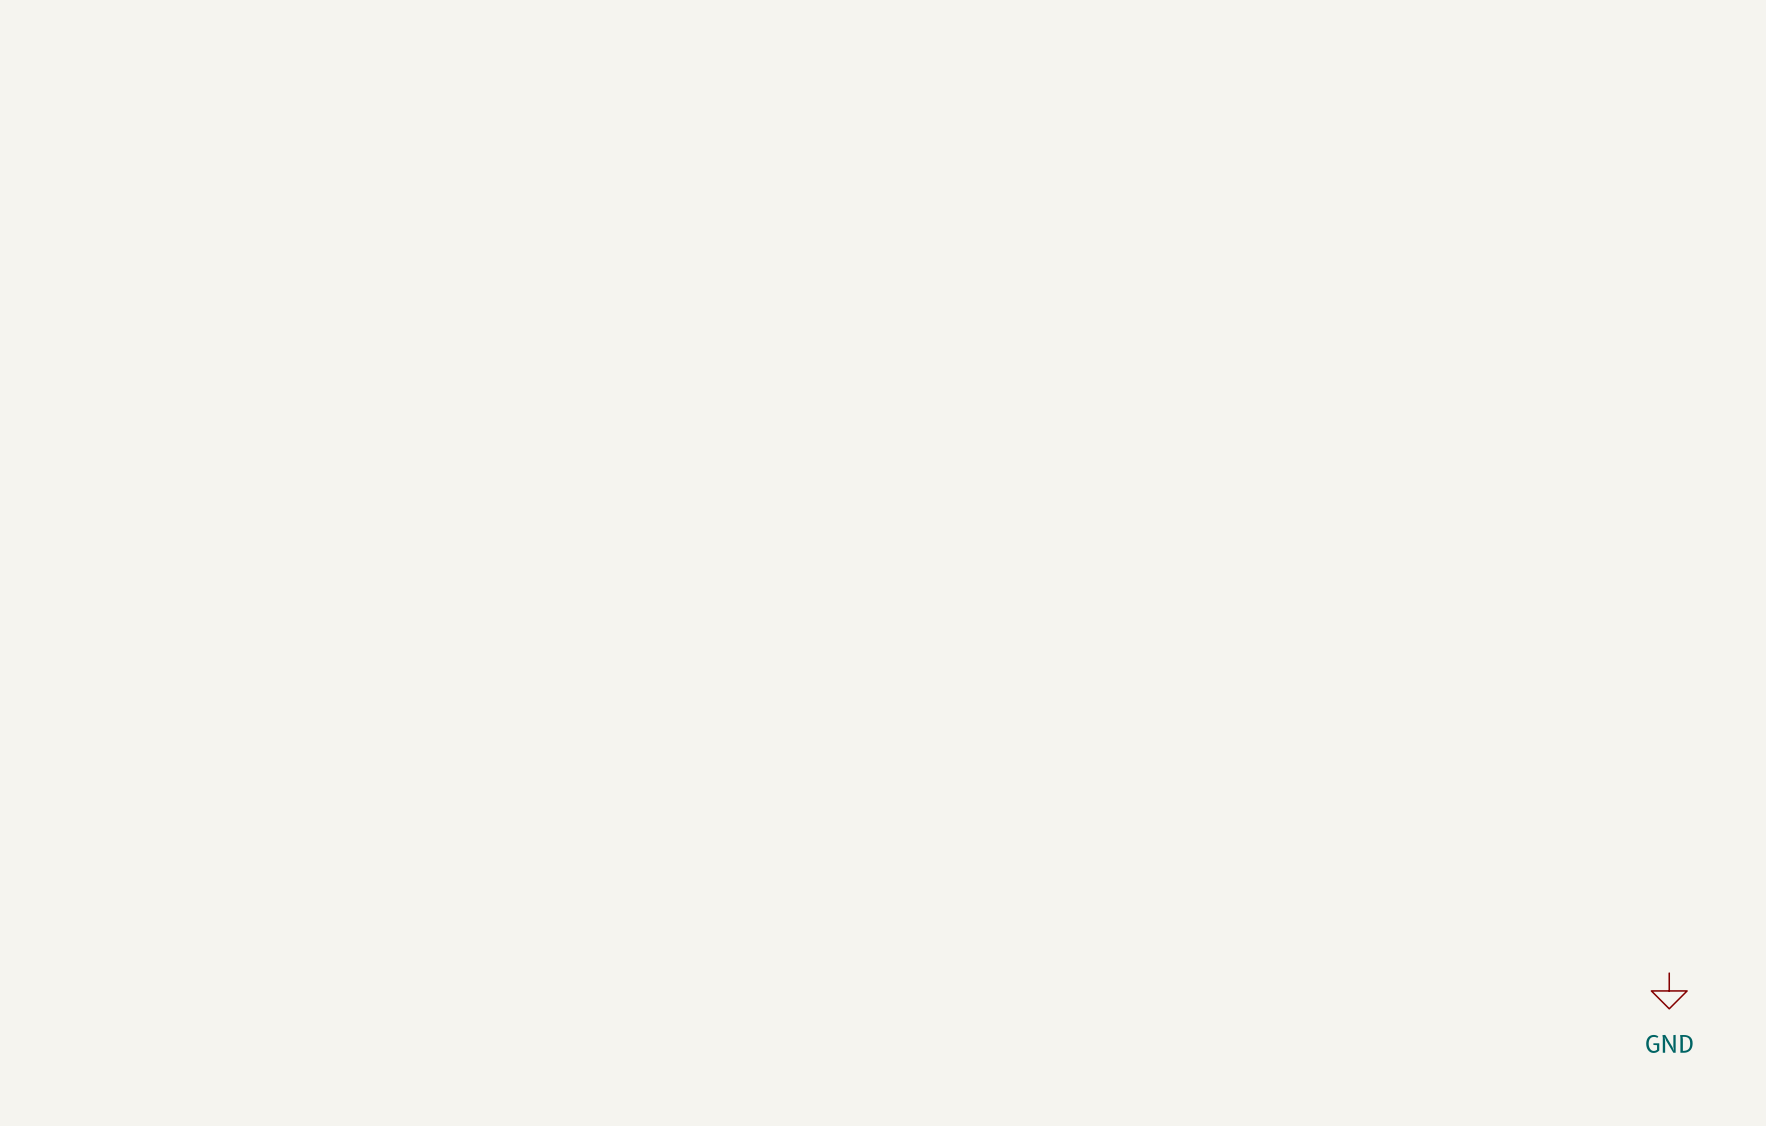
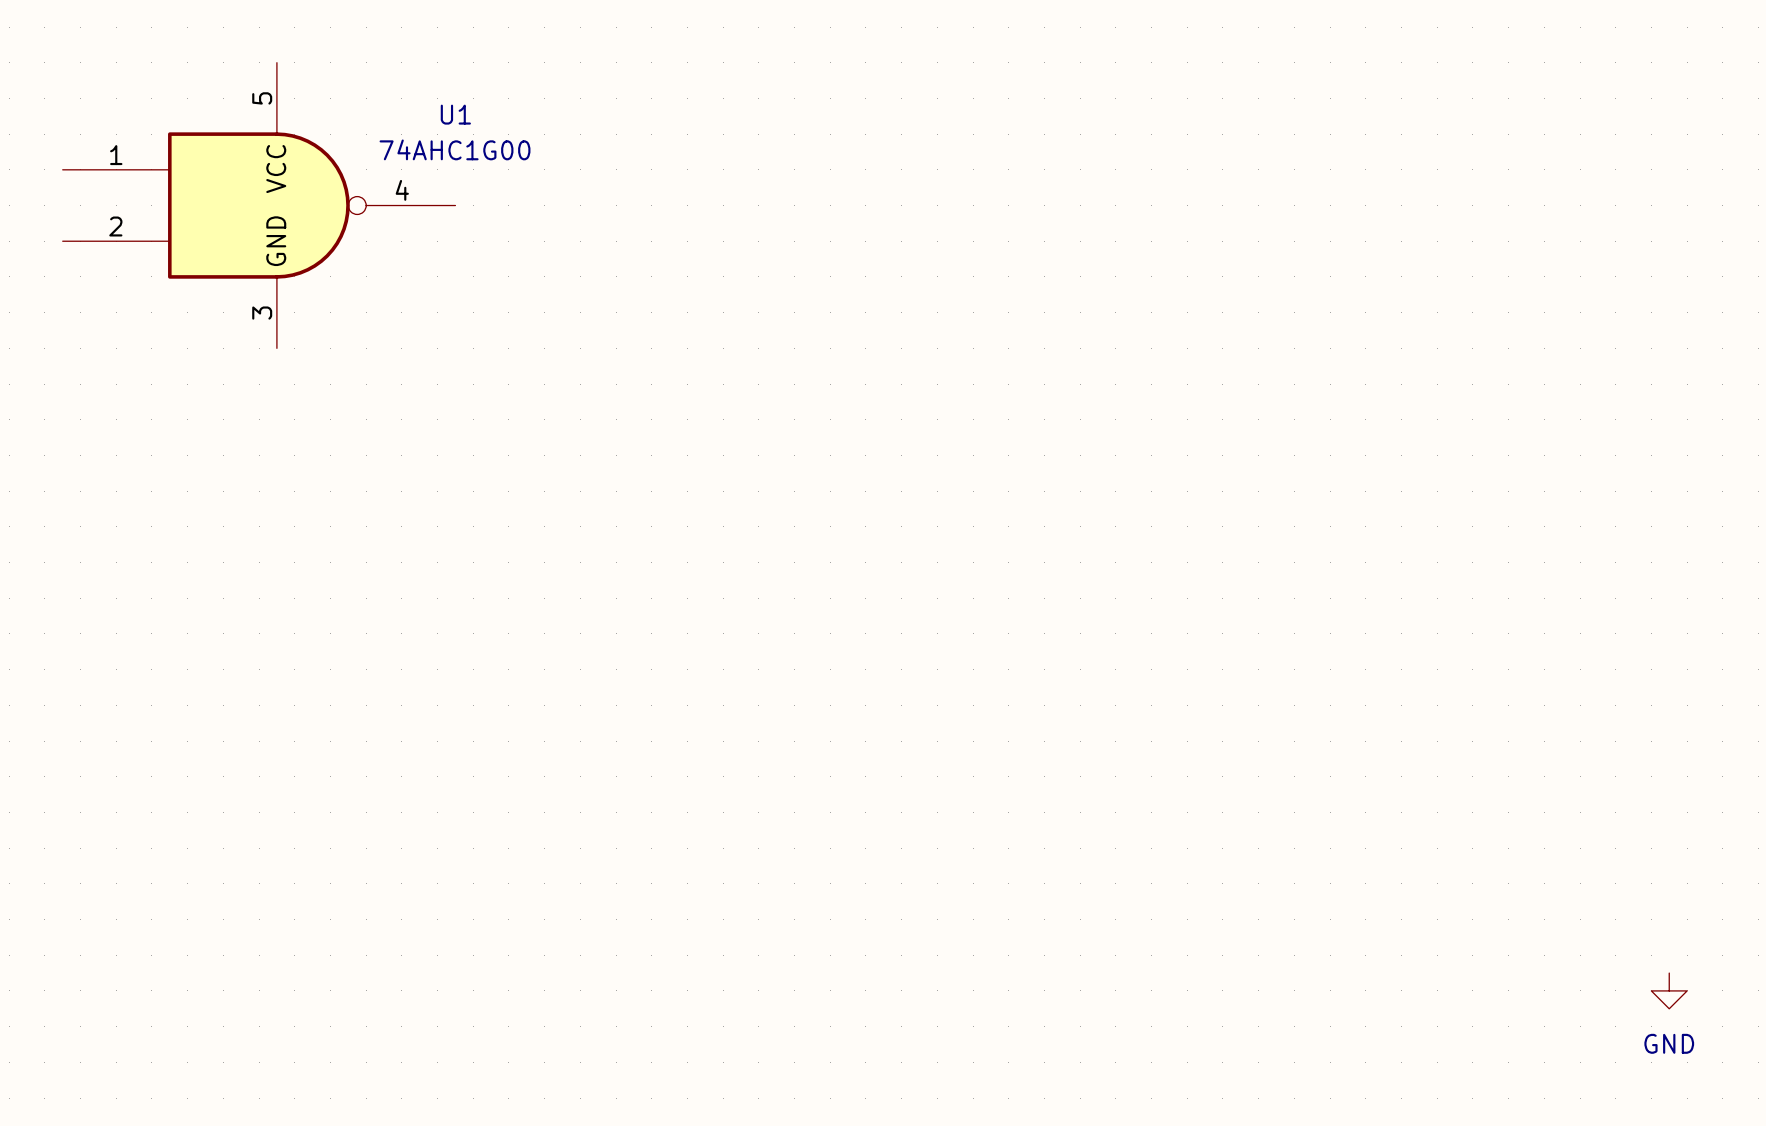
U1: none -> 74AHC1G00 (259, 205)

